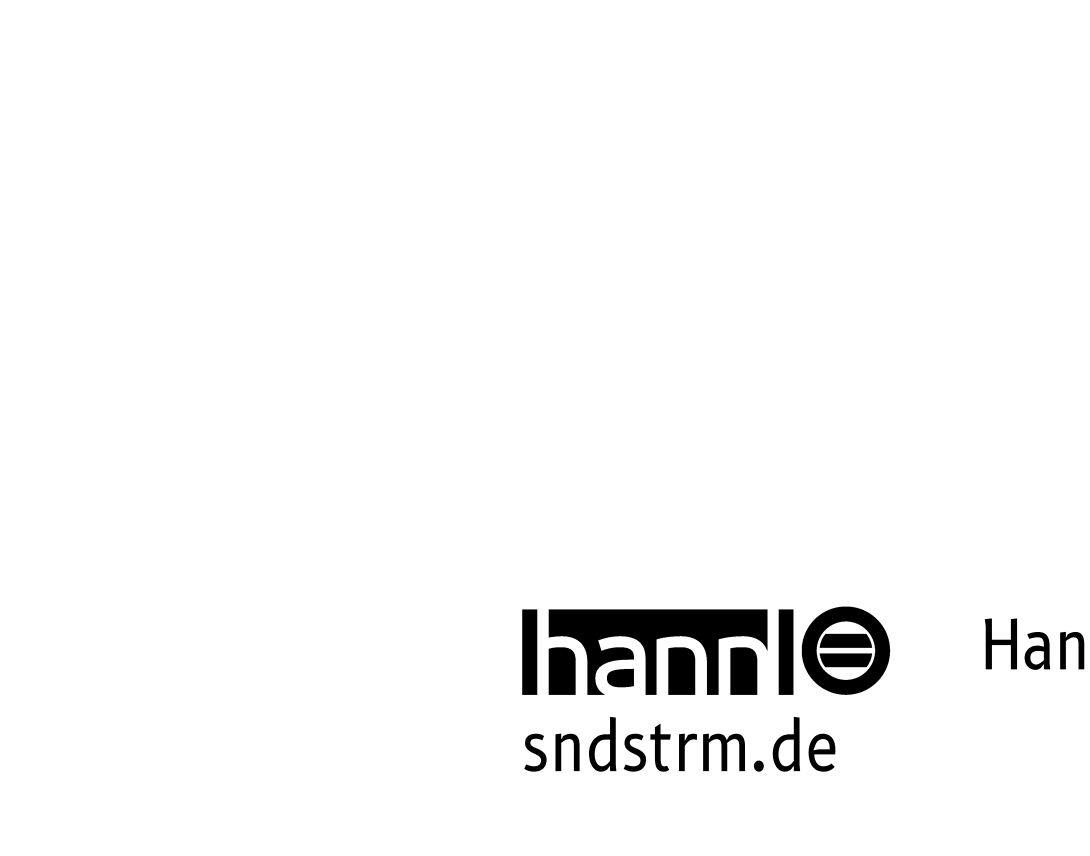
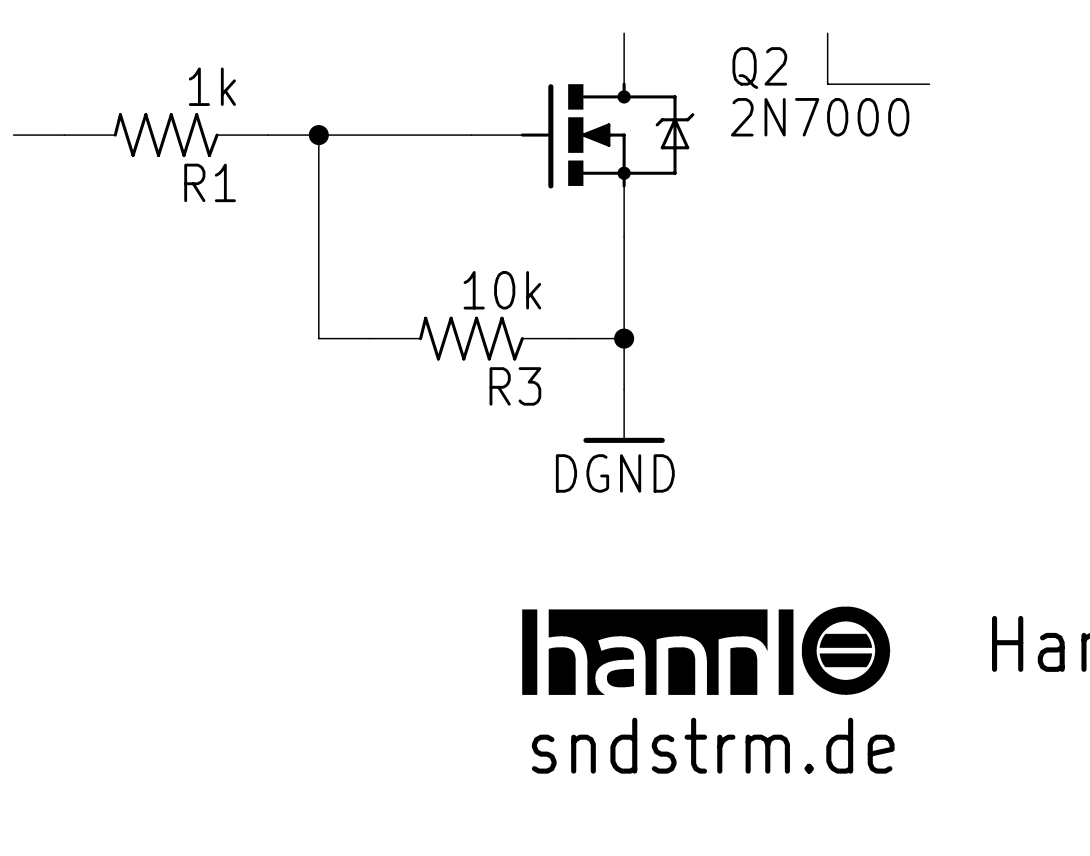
wire: none -> (827, 33) (827, 84) (929, 84)
wire: none -> (13, 135) (64, 135)
R1: none -> 1k (166, 135)
wire: none -> (267, 135) (471, 135)
wire: none -> (318, 135) (318, 338) (369, 338)
junction: none -> (318, 135)
Q2: none -> 2N7000 (582, 135)
wire: none -> (624, 236) (624, 389)
R3: none -> 10k (471, 338)
wire: none -> (573, 338) (624, 338)
junction: none -> (624, 338)
power symbol: none -> DGND (624, 416)

